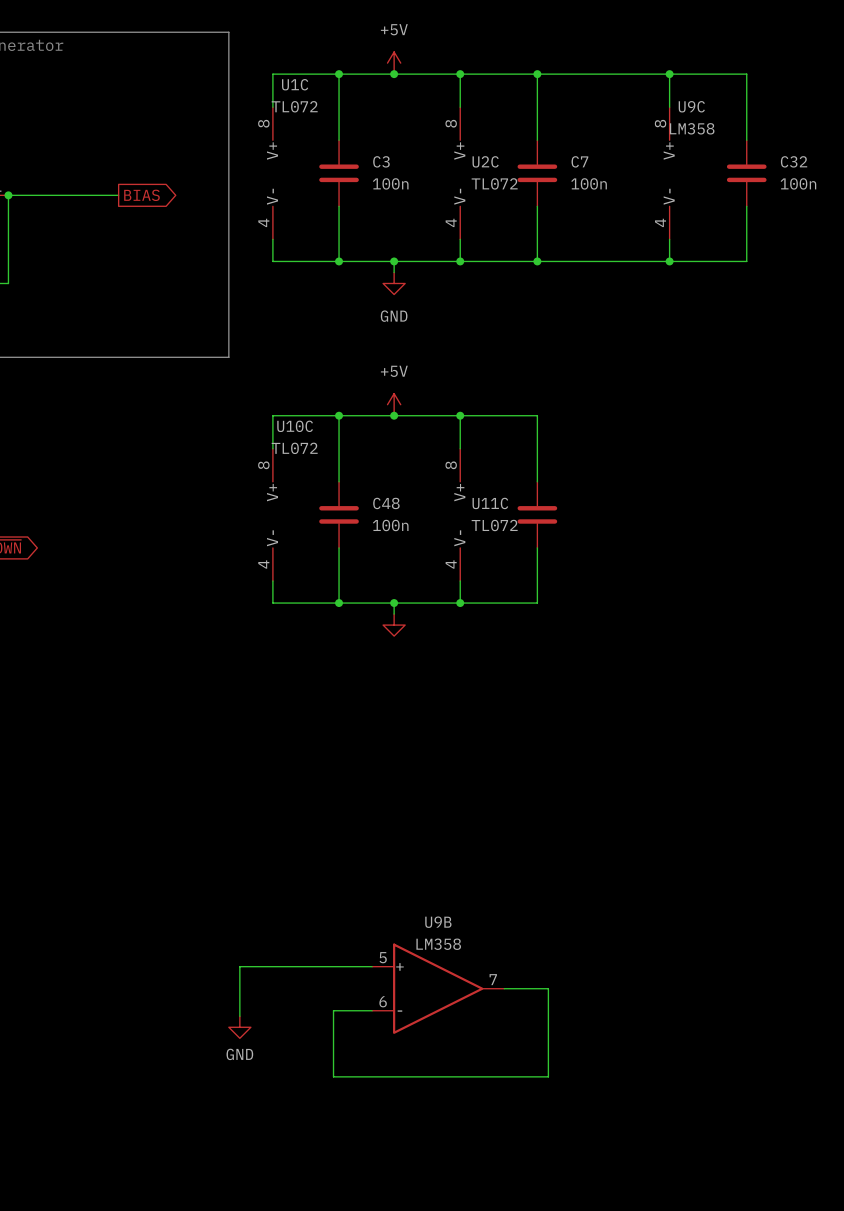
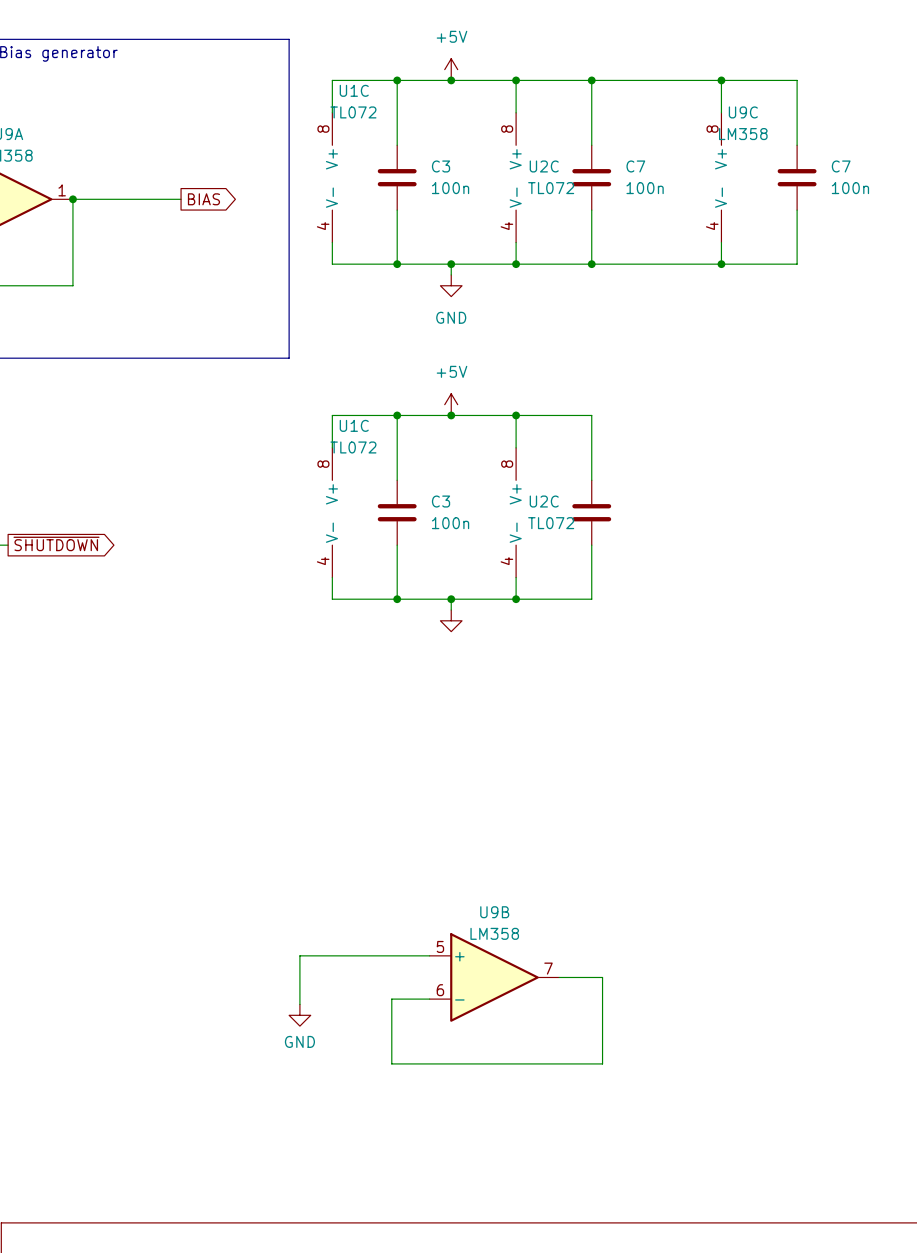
C32 name: C32 (794, 161) -> C7 (841, 166)
U10C name: U10C (295, 426) -> U1C (354, 425)
C48 name: C48 (386, 503) -> C3 (441, 501)
U11C name: U11C (490, 503) -> U2C (544, 501)

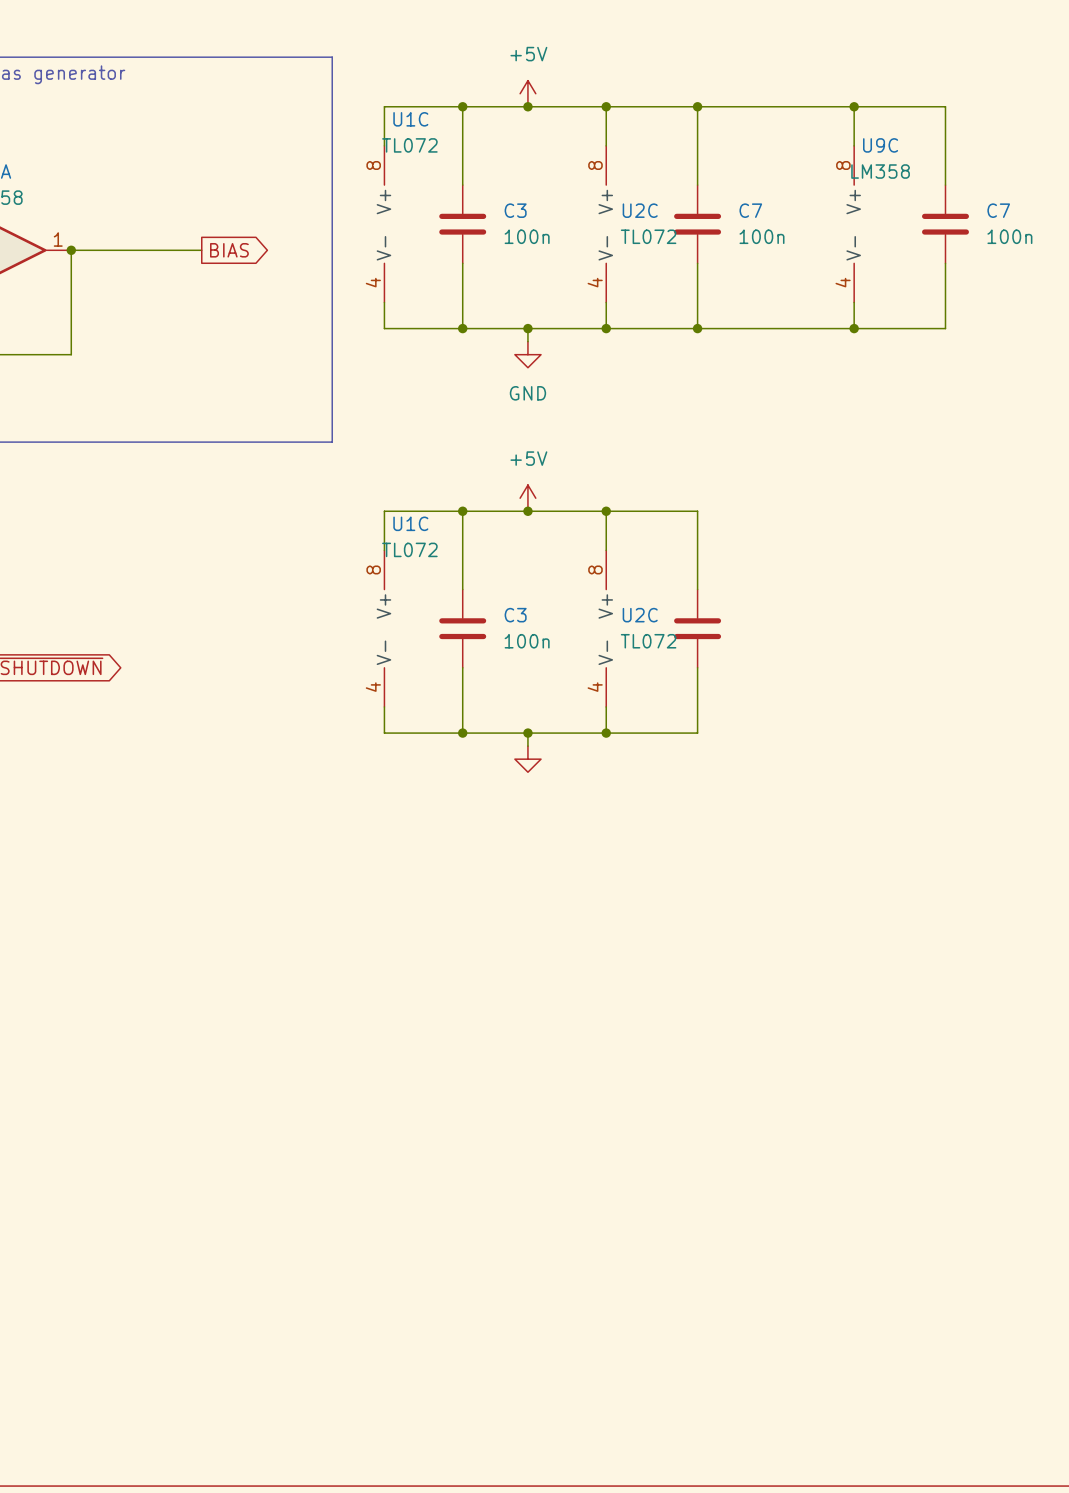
wire: (429, 955) (299, 955) (299, 1004) -> none
U9B: LM358 (494, 977) -> none
wire: (559, 977) (602, 977) (602, 1063) (391, 1063) (391, 999) (429, 999) -> none
power symbol: GND (299, 1015) -> none

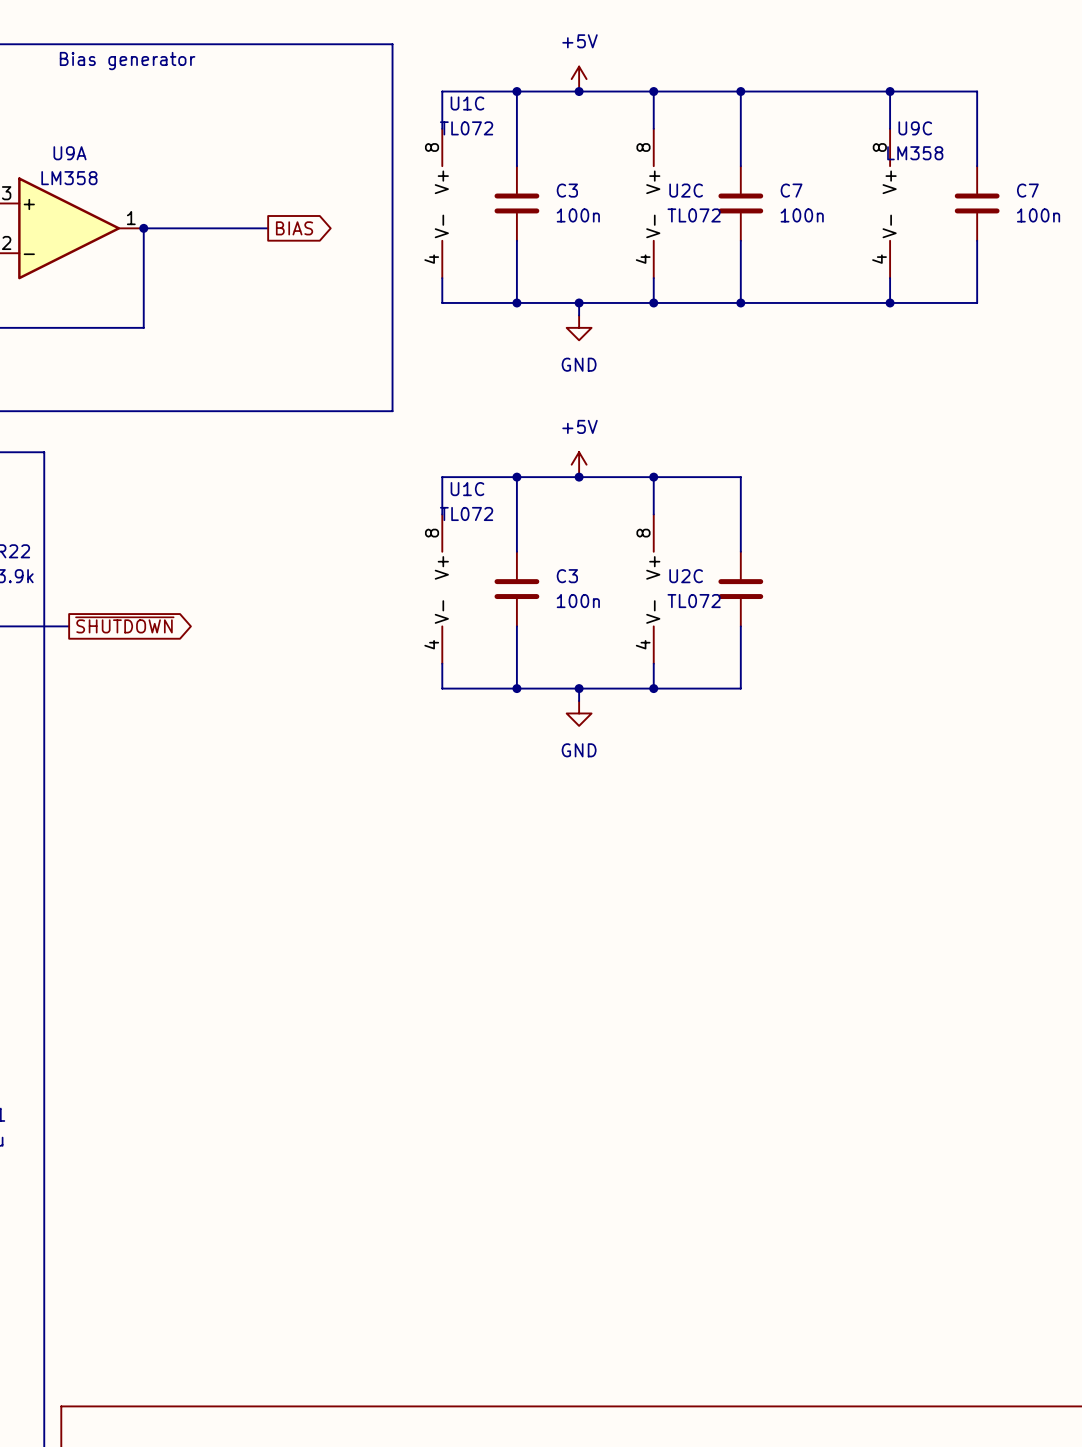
power symbol text: none -> GND (579, 750)

